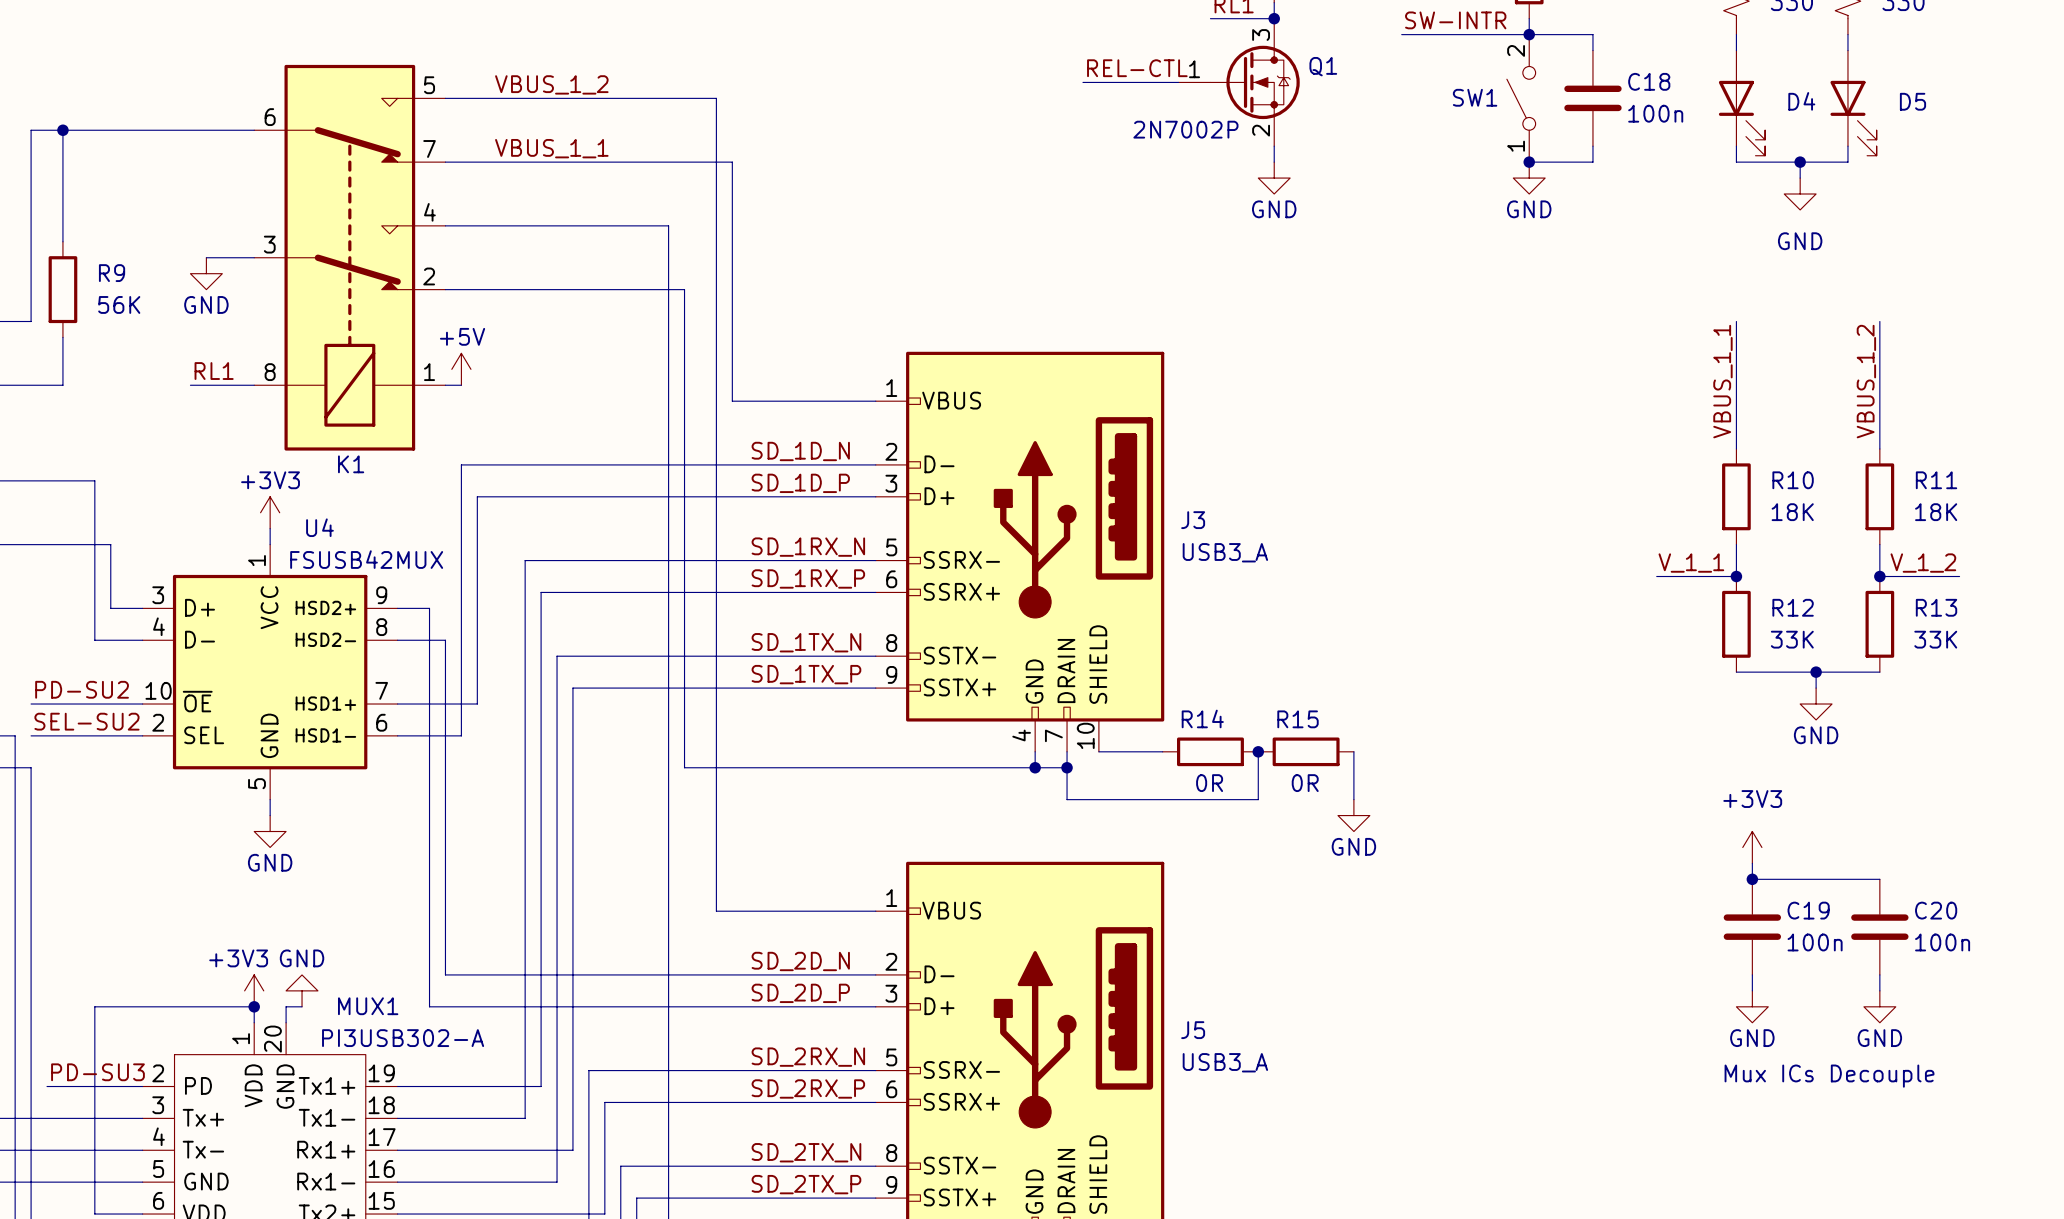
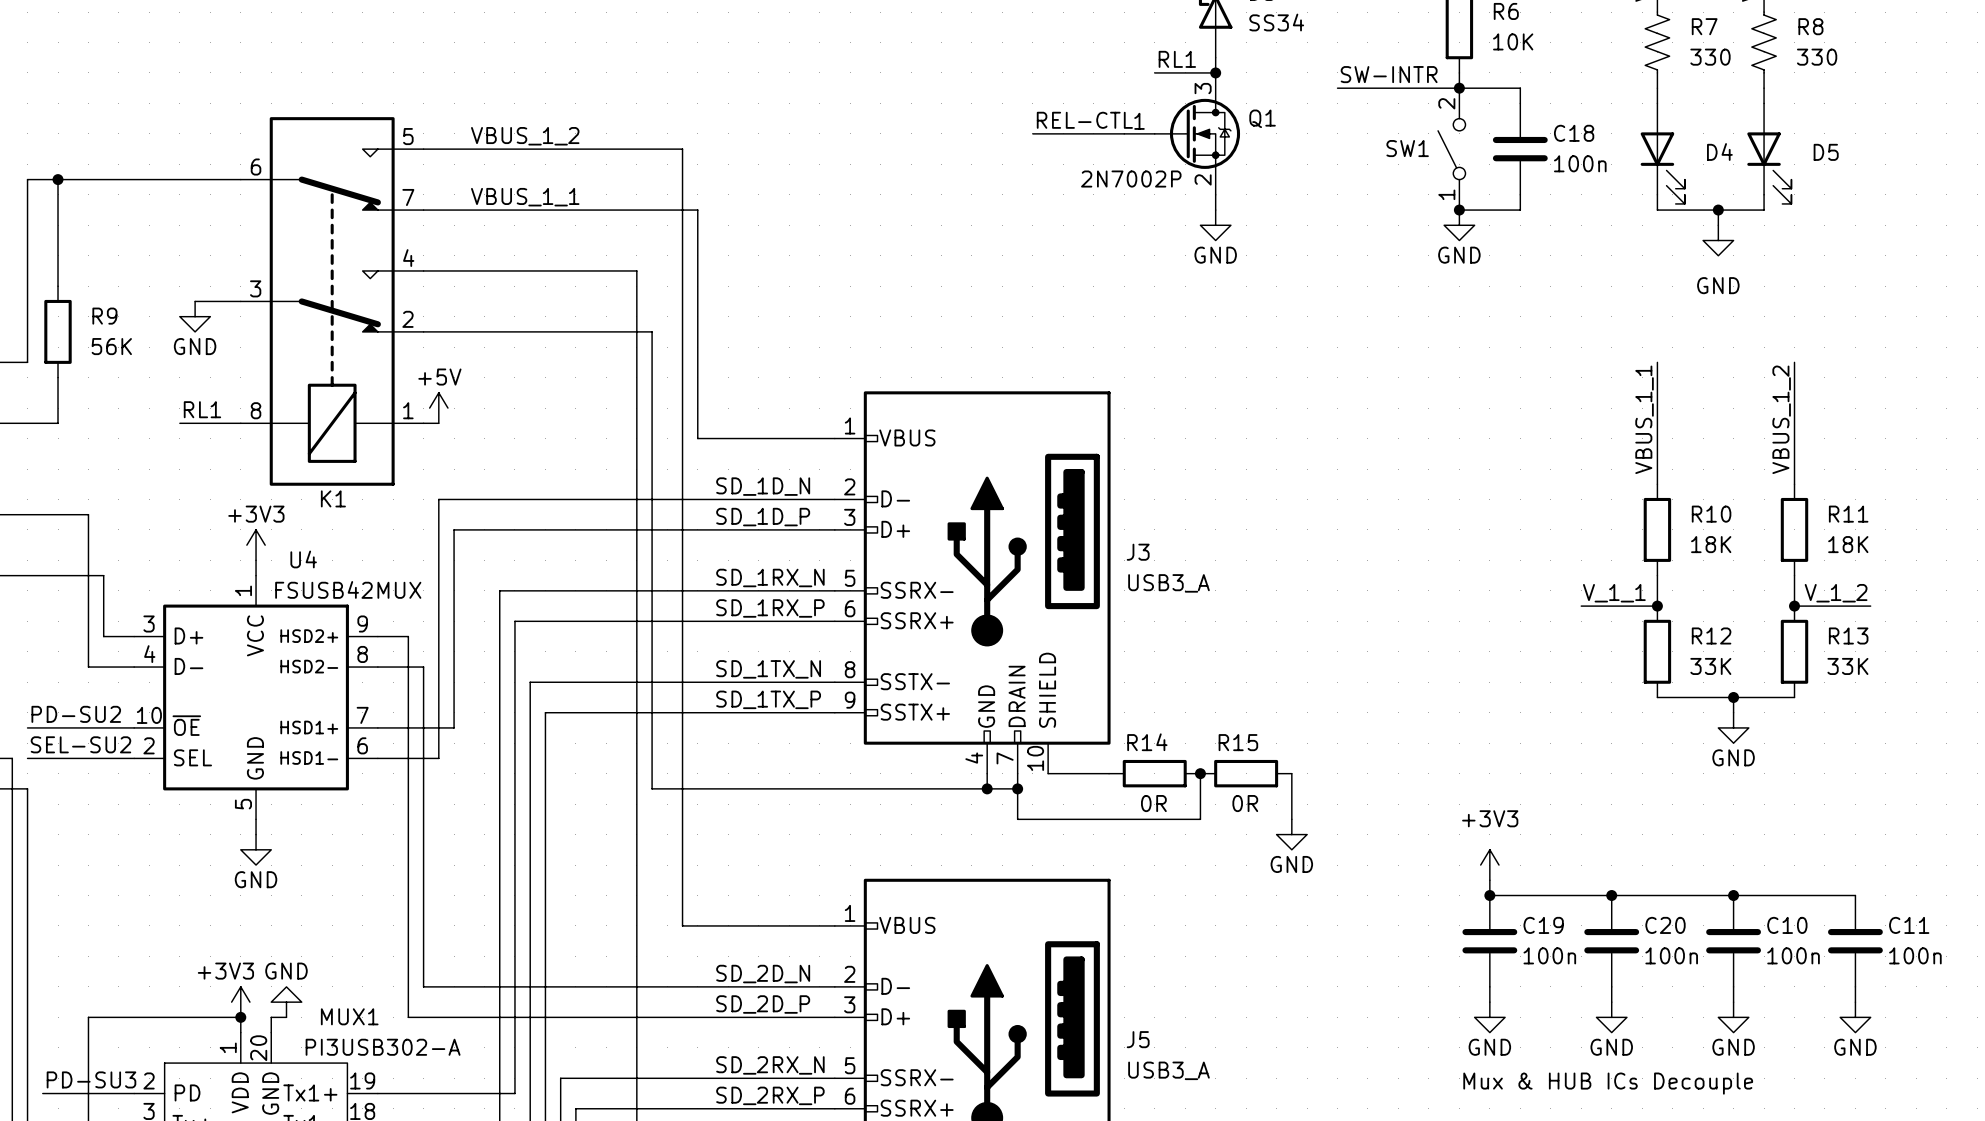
power symbol position: +3V3 (1752, 847) -> +3V3 (1489, 865)
wire: (1752, 863) (1752, 879) -> (1489, 880) (1489, 895) (1672, 895)
junction: none -> (1489, 895)
junction: none -> (1611, 895)
junction: (1752, 879) -> none
junction: none -> (1733, 895)
wire: none -> (1794, 895) (1855, 895)
C19 position: (1752, 927) -> (1489, 941)
C10: none -> 100n (1733, 941)
C20 position: (1879, 927) -> (1611, 941)
C11: none -> 100n (1855, 941)
wire: none -> (1489, 986) (1489, 1002)
wire: (1752, 974) (1752, 990) -> (1611, 986) (1611, 1002)
wire: (1879, 974) (1879, 990) -> (1733, 986) (1733, 1002)
wire: none -> (1855, 986) (1855, 1002)
power symbol: none -> GND (1489, 1017)
power symbol: none -> GND (1611, 1017)
power symbol: GND (1752, 1006) -> none
power symbol: none -> GND (1733, 1017)
power symbol: GND (1879, 1006) -> none
power symbol: none -> GND (1855, 1017)
text: Mux ICs Decouple (1829, 1076) -> Mux & HUB ICs Decouple (1608, 1083)

